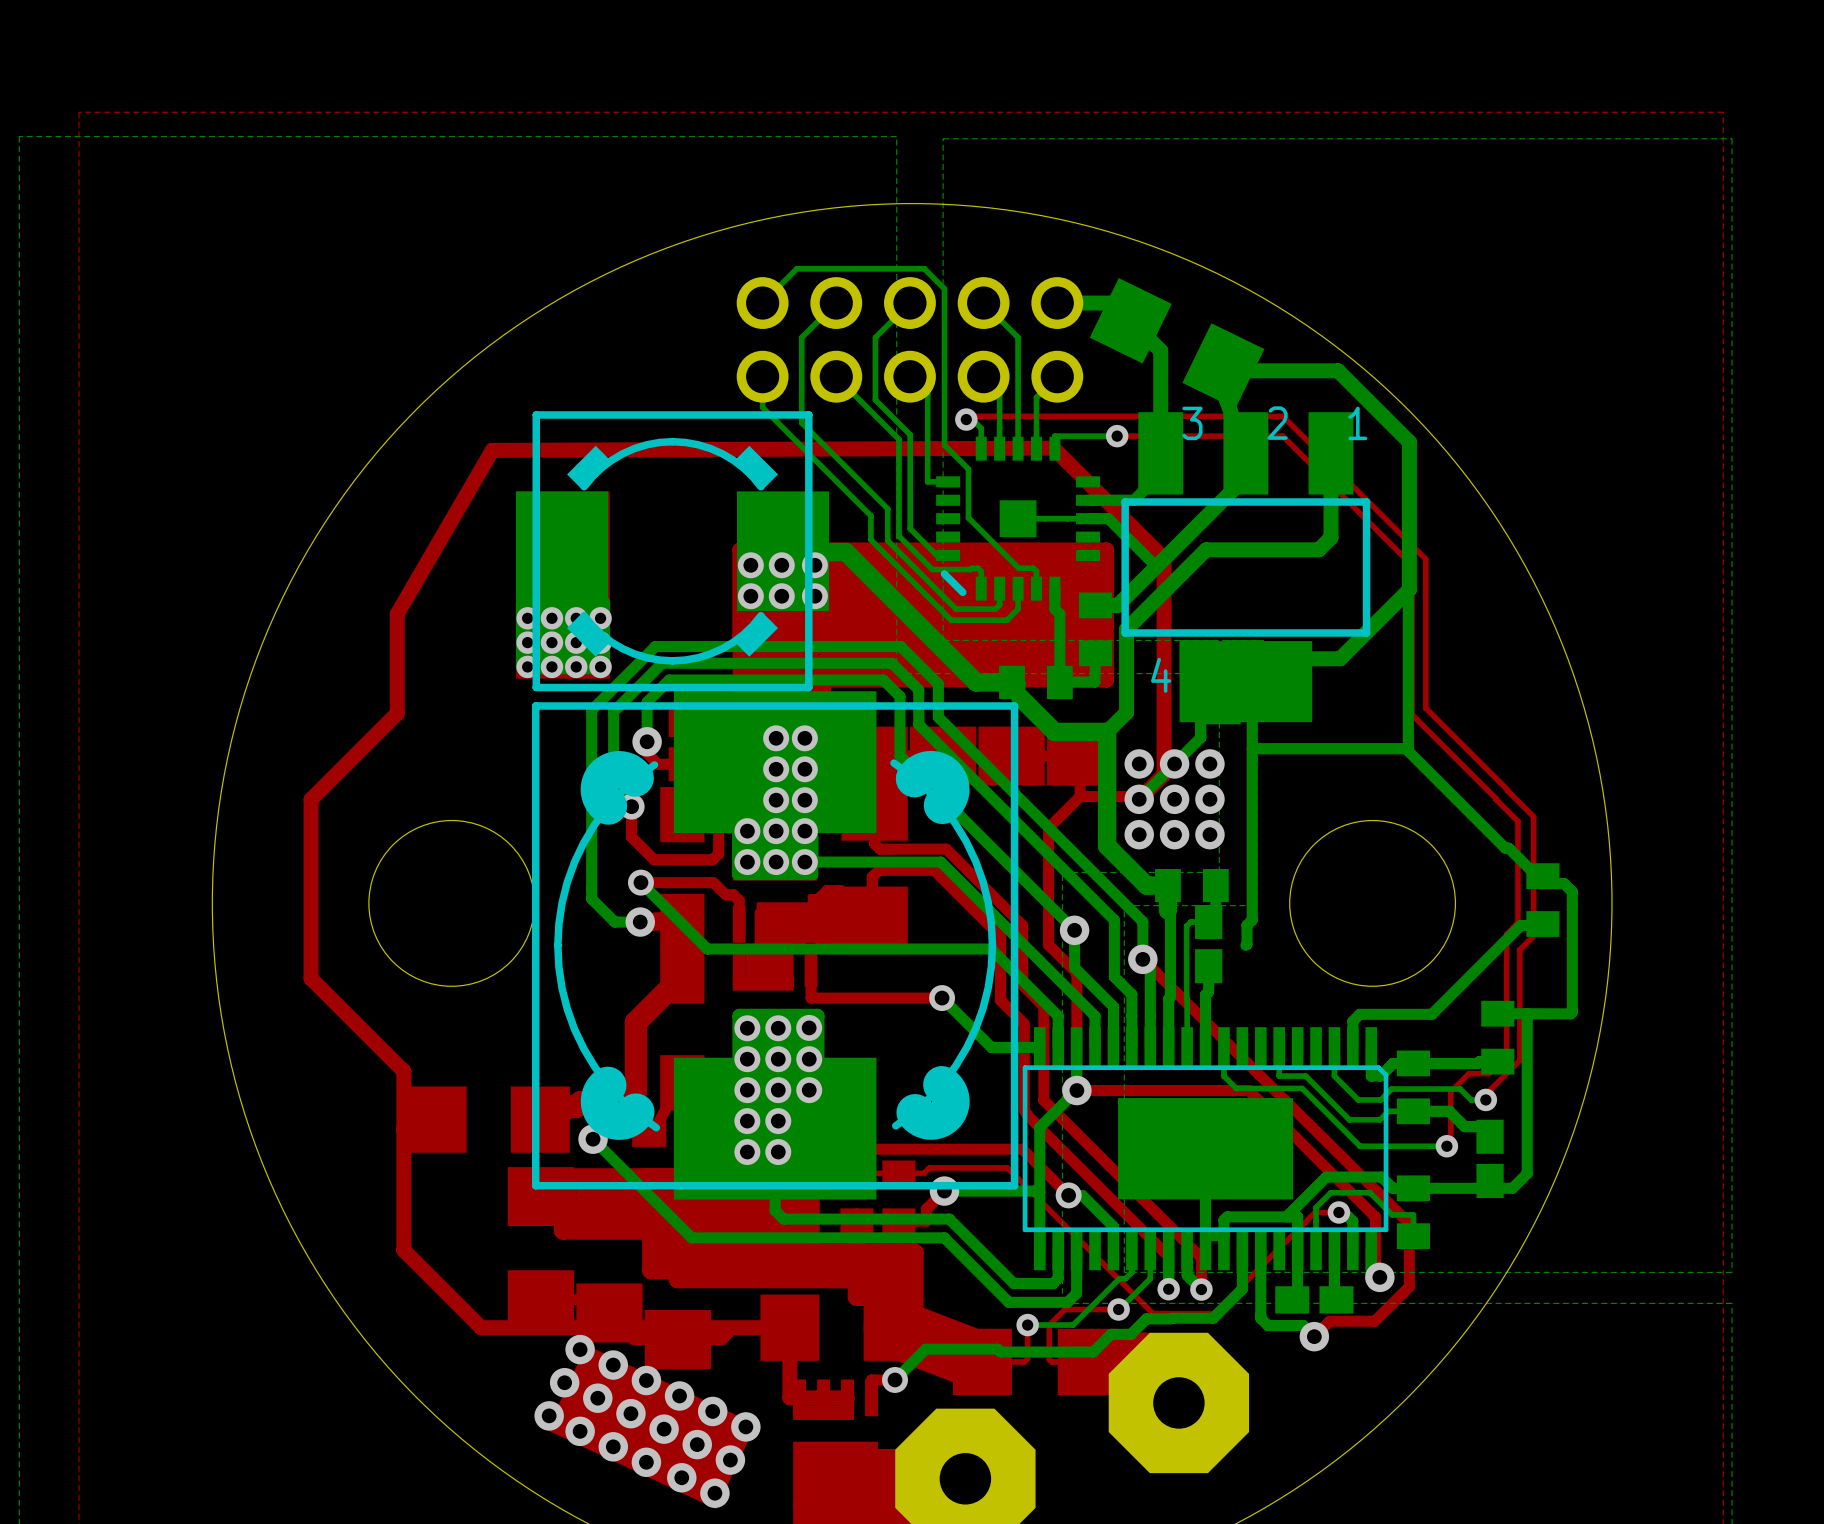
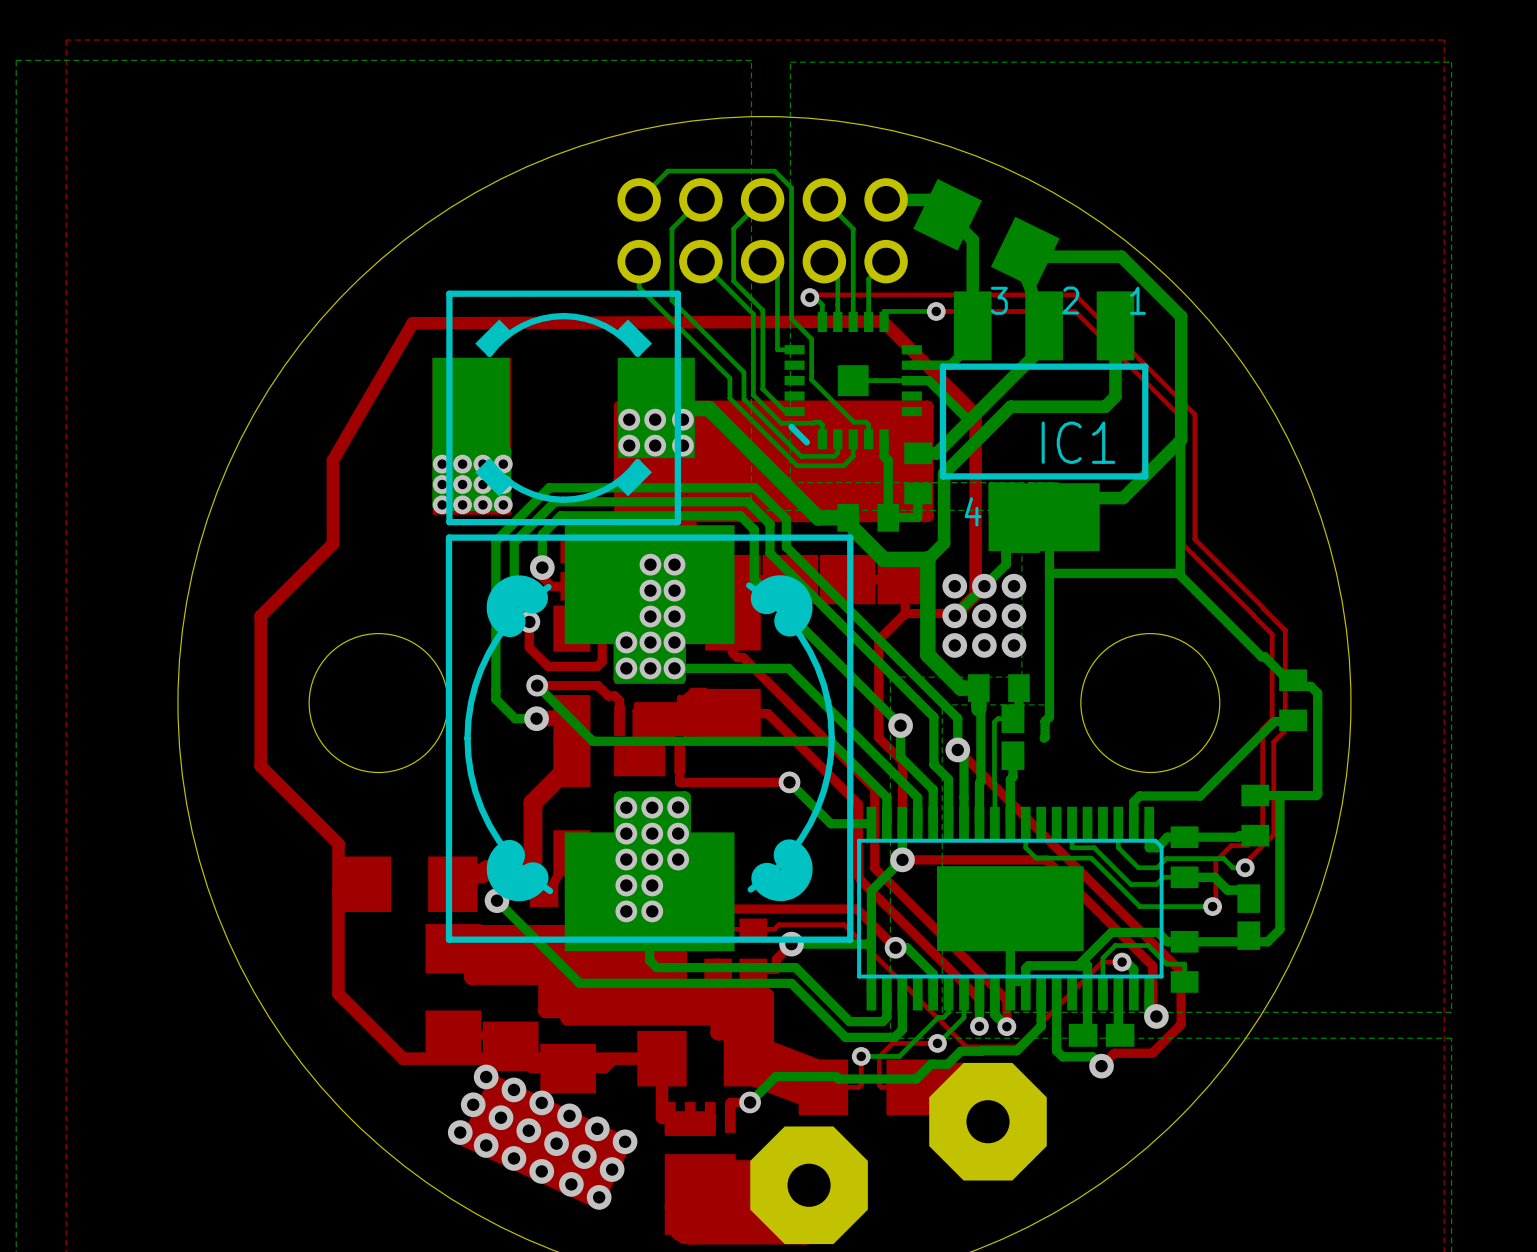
IC1 name: none -> IC1 (1078, 442)
top track: (886, 849) (946, 849) (1022, 925) (1022, 985) (1043, 1006) -> (743, 657) (874, 789)
top track: (874, 916) (872, 916) (872, 876) (879, 870) (934, 870) (1000, 936) (1000, 1000) -> (732, 713) (767, 713) (838, 784)

